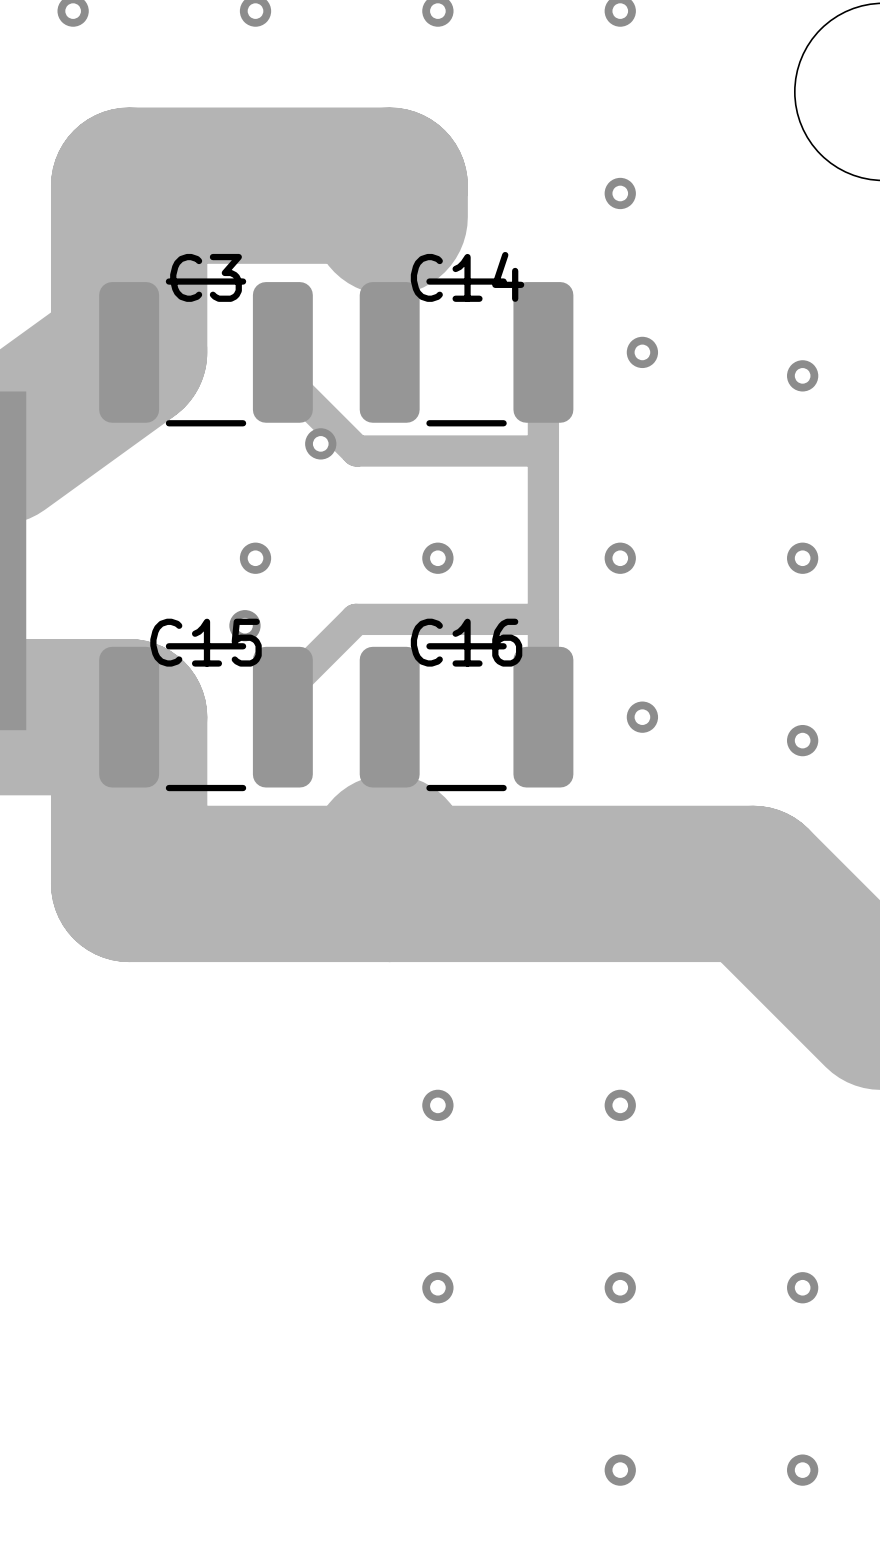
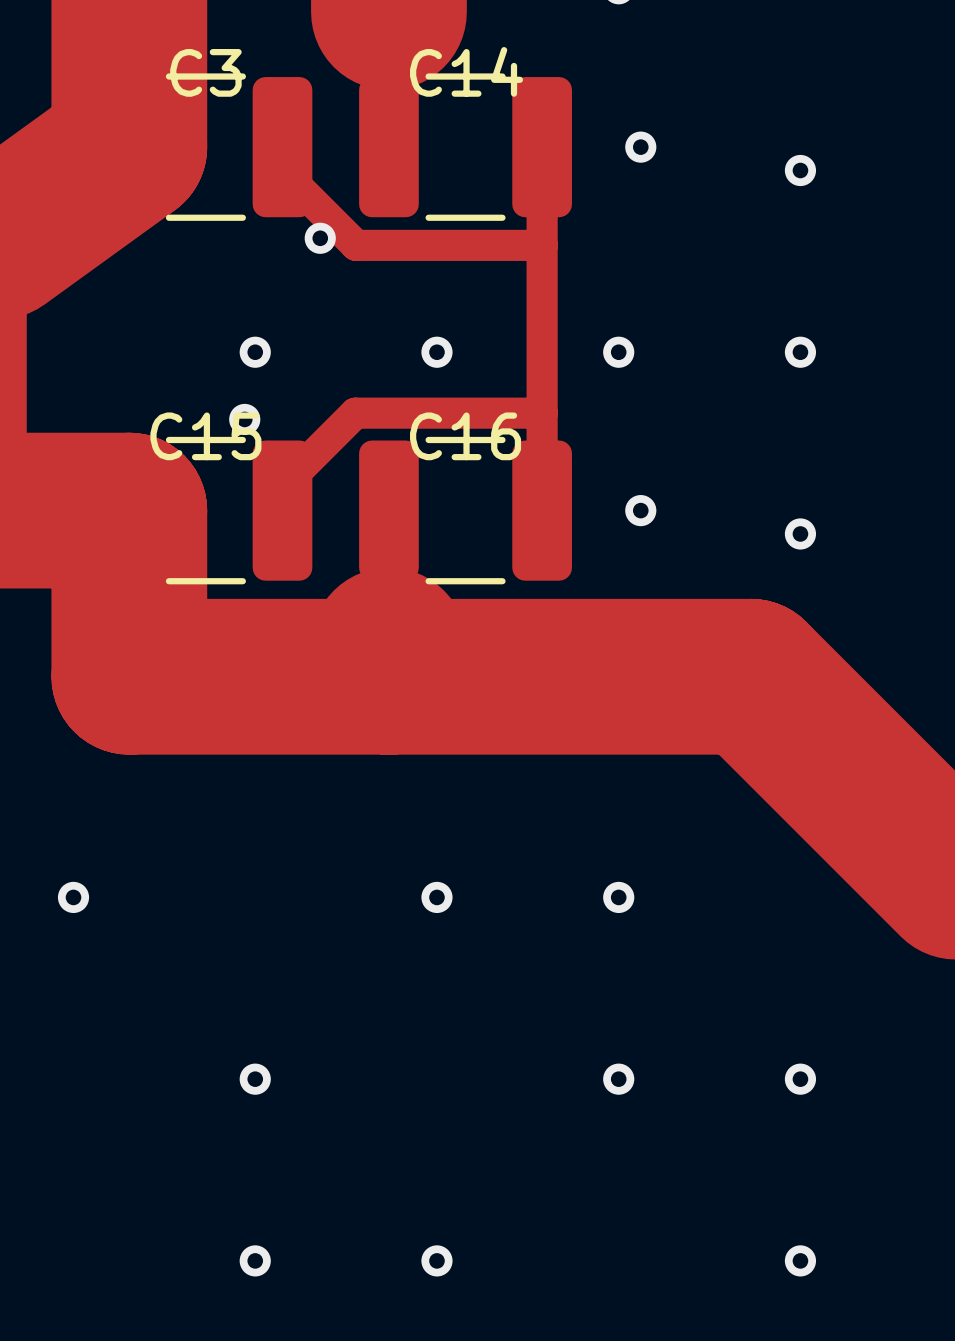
via: none -> (73, 897)
via: none -> (255, 1079)
via: (437, 1287) -> none
via: none -> (255, 1260)
via: none -> (436, 1260)
via: (620, 1470) -> none

